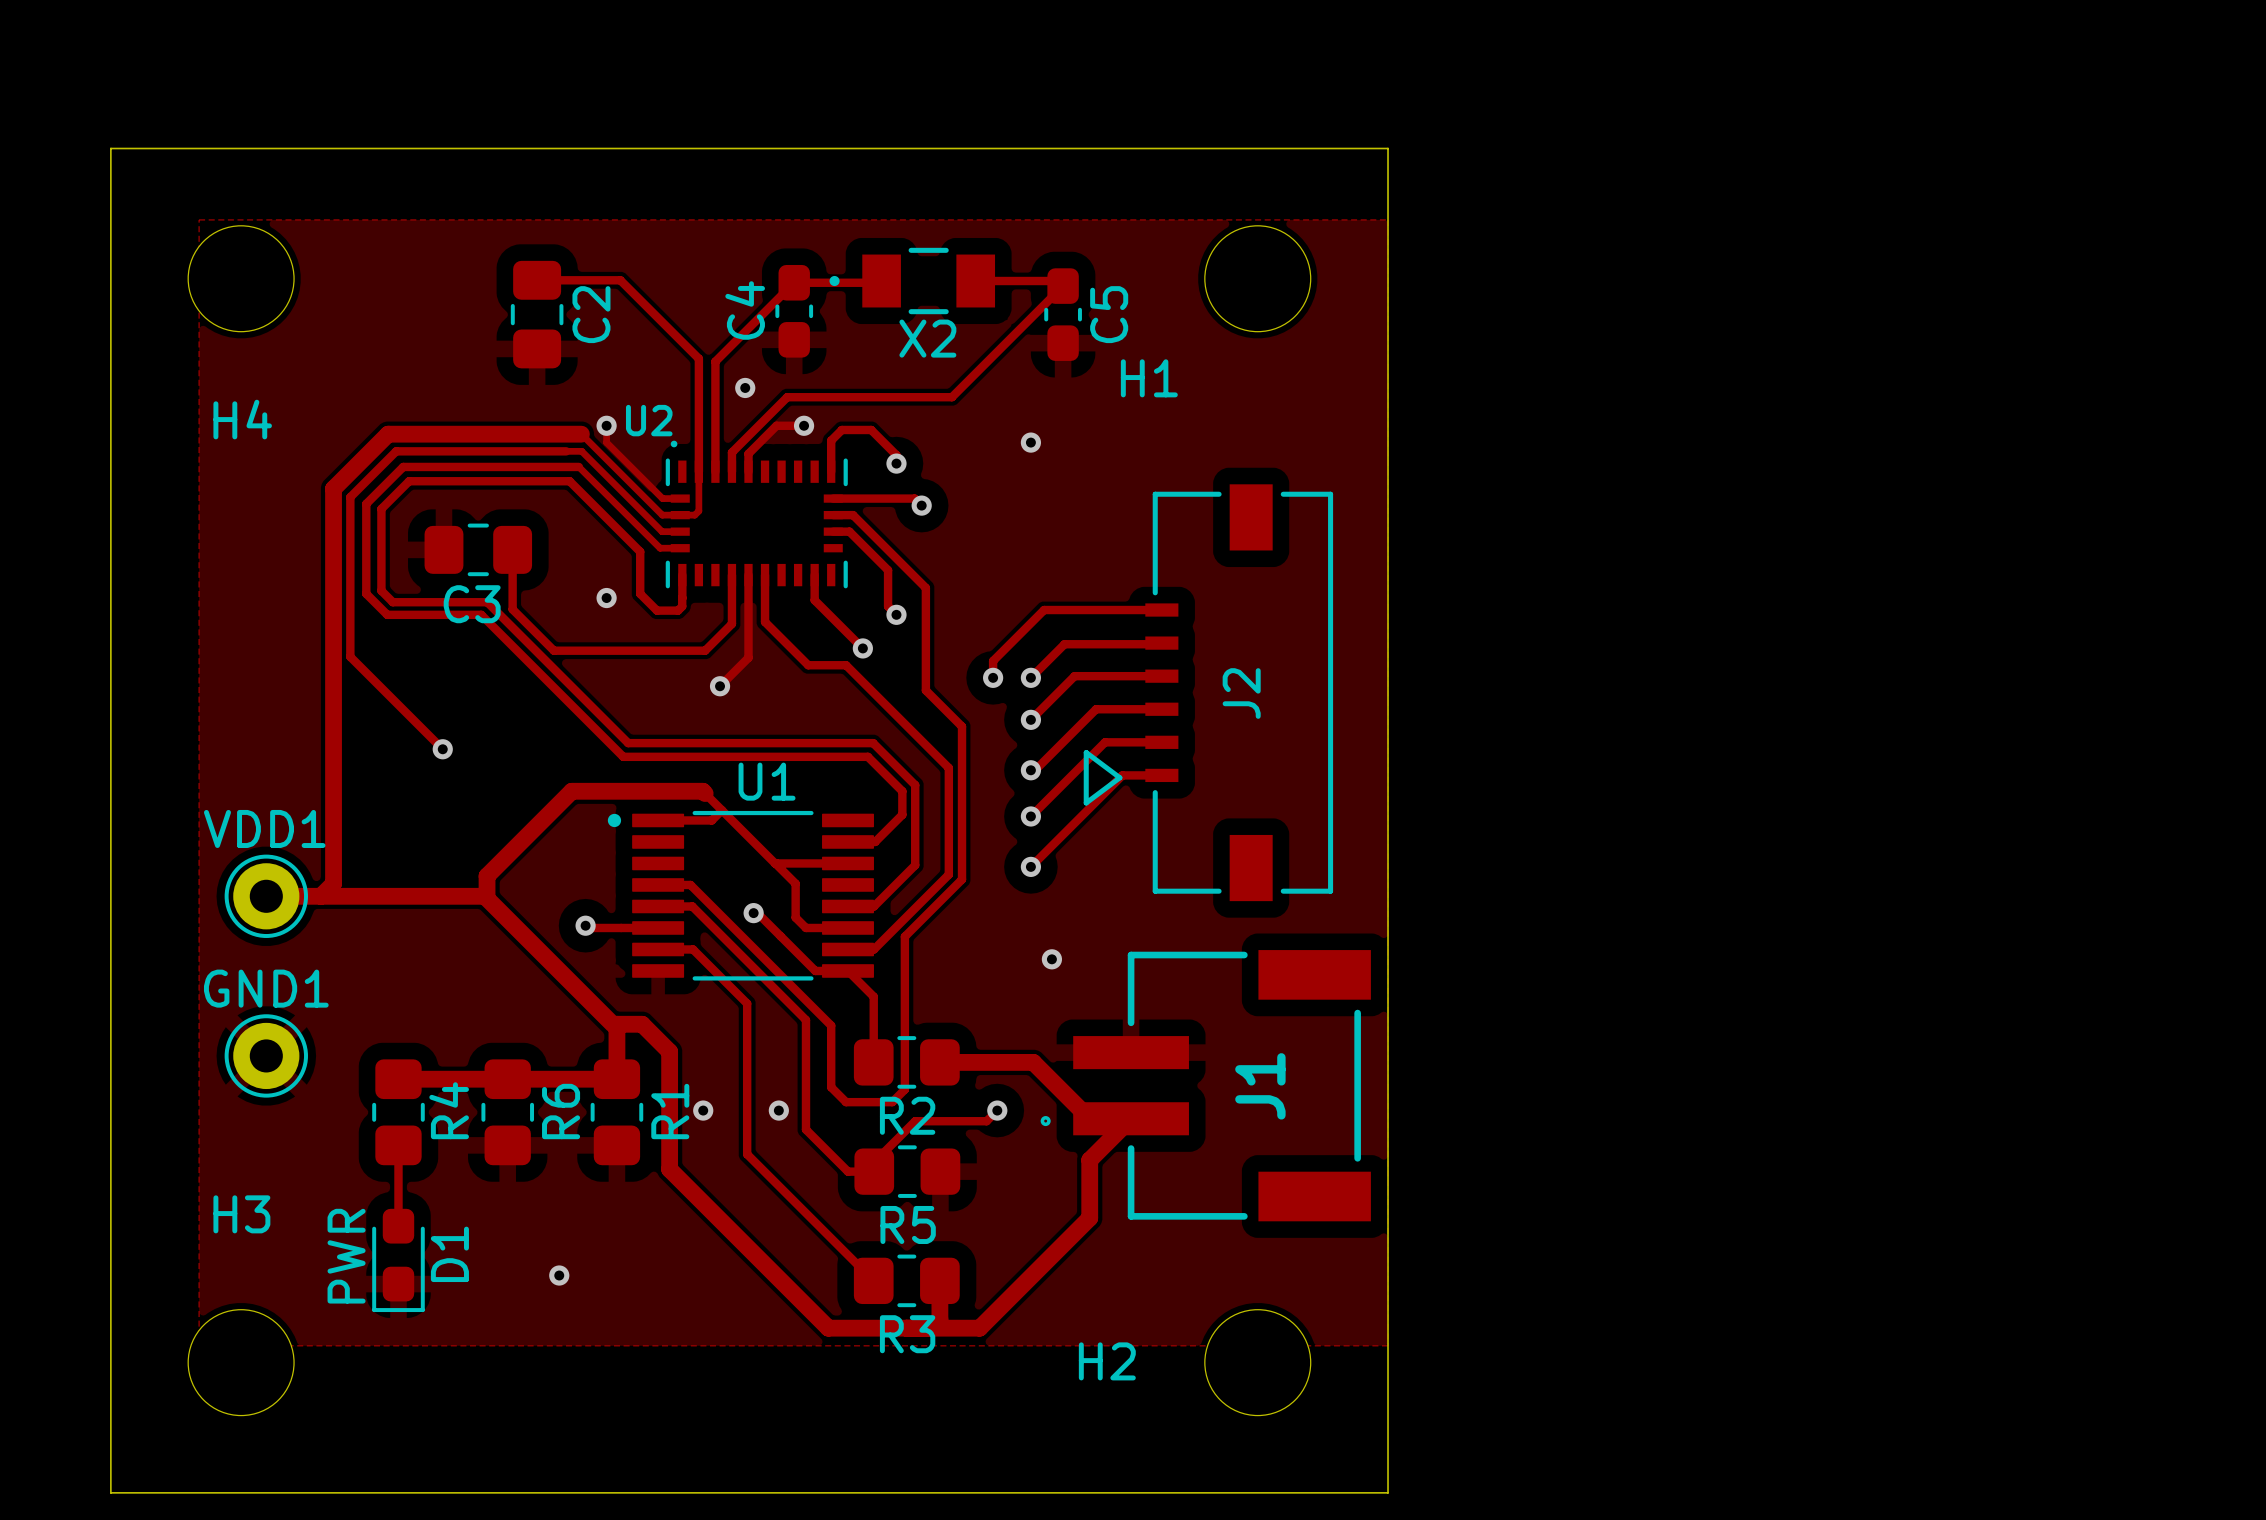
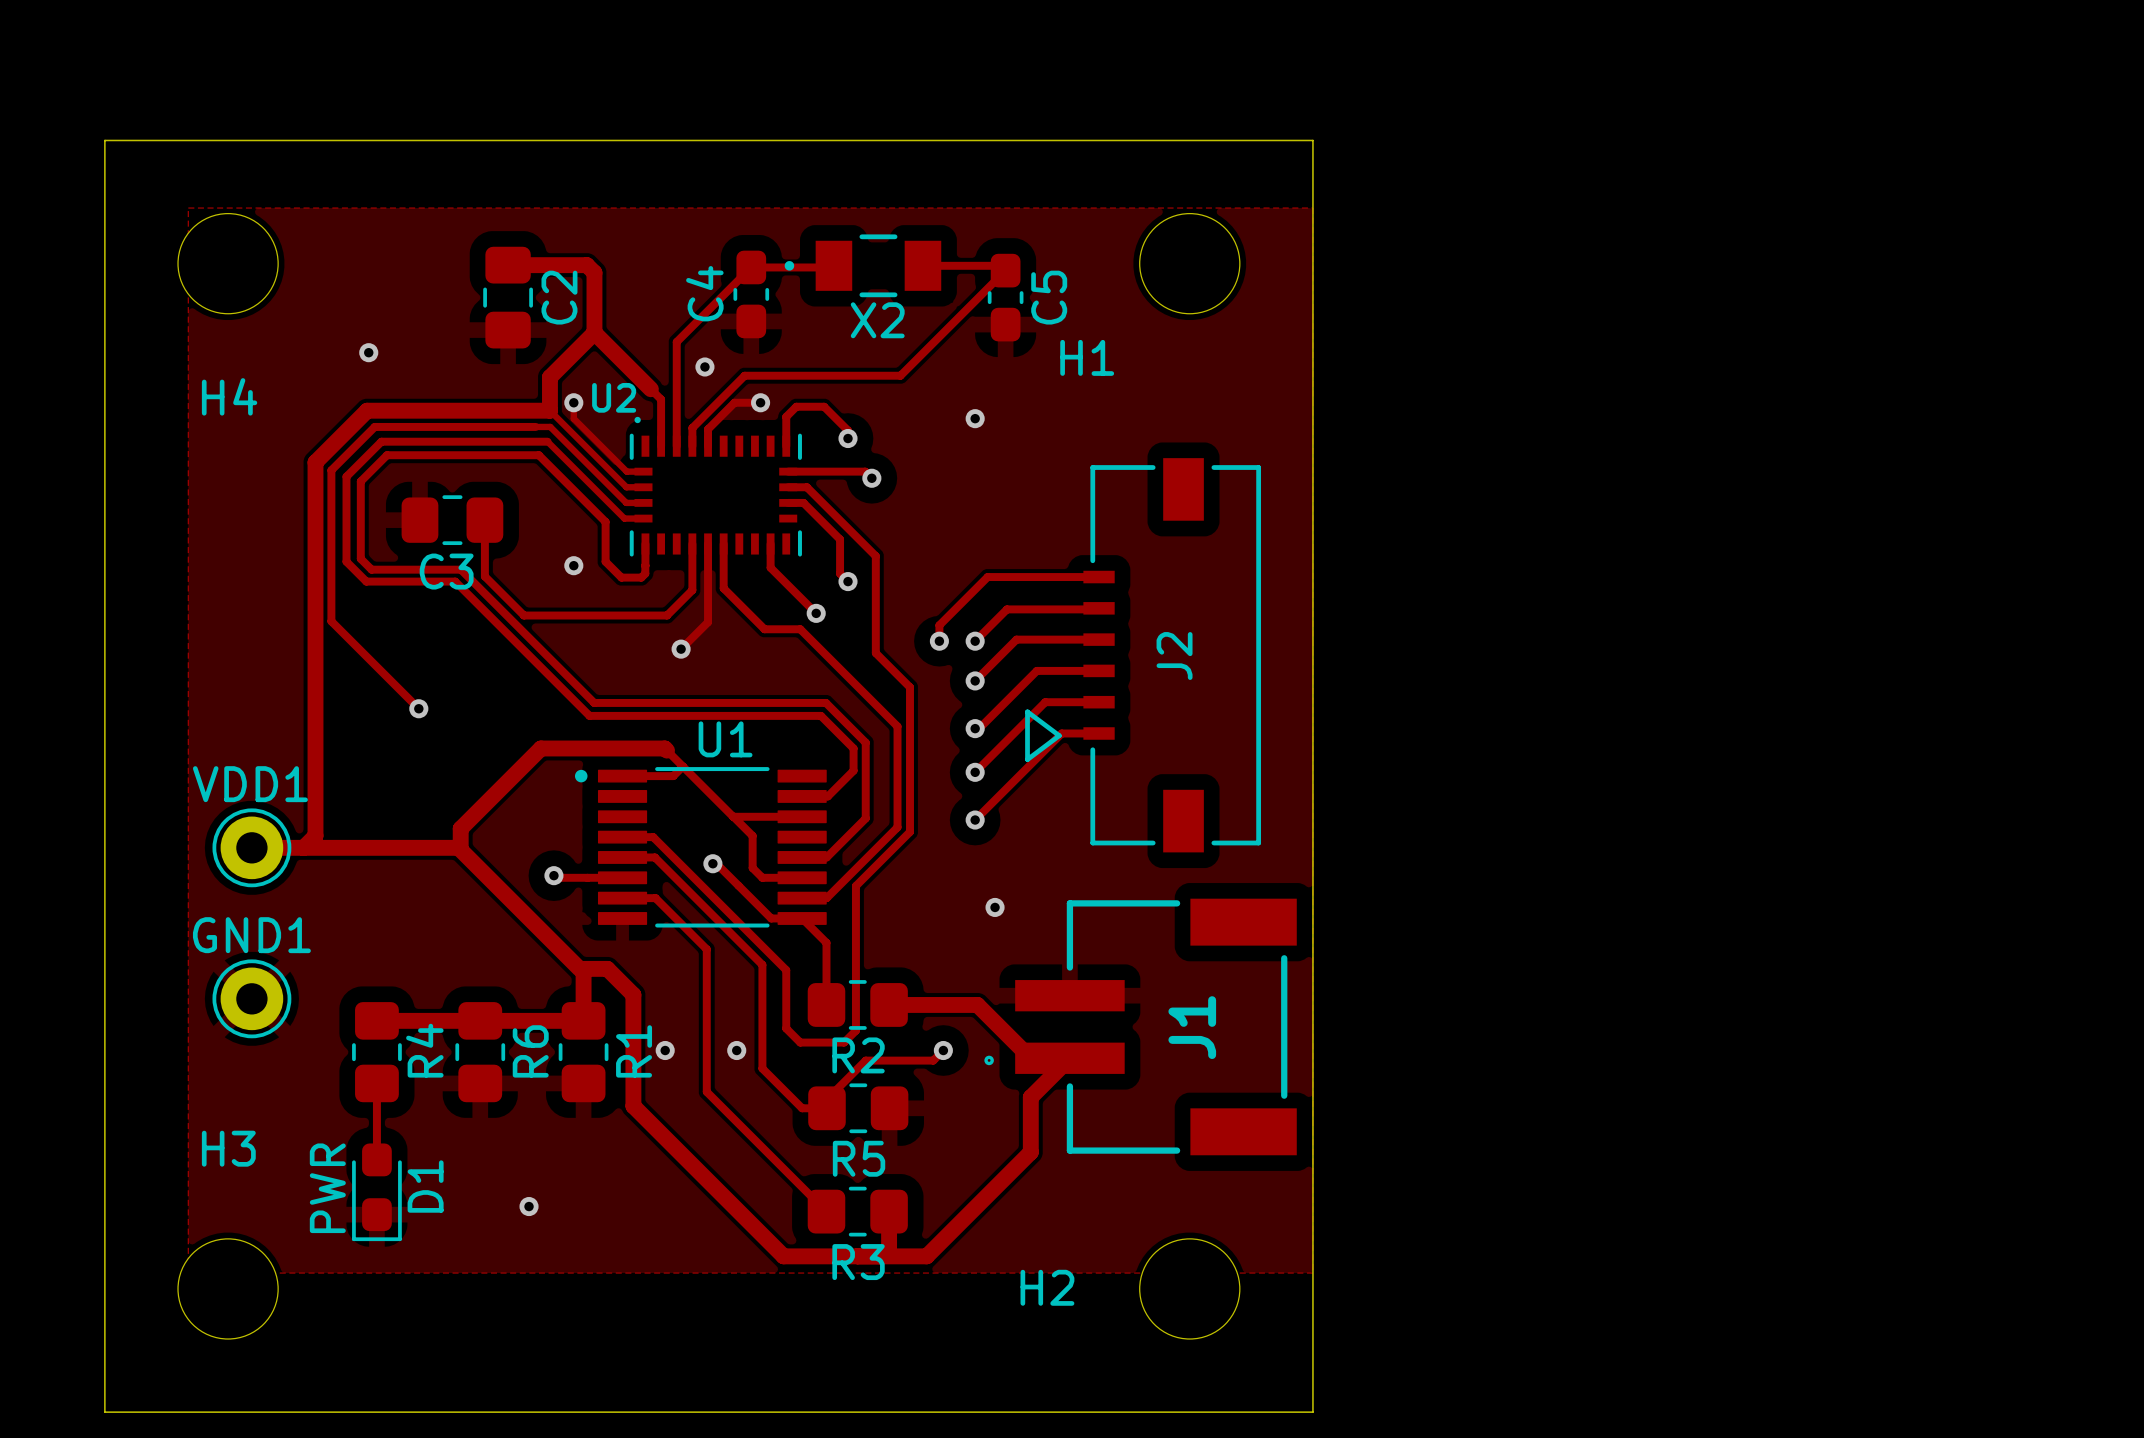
track width: thin (537, 280) (620, 280) (628, 288) -> thick (508, 265) (586, 265) (594, 272)
track: (628, 288) (698, 358) (698, 422) -> (594, 332) (661, 399)
track: none -> (594, 272) (594, 332)
track: none -> (594, 332) (549, 377) (549, 410)
via: none -> (368, 352)
track: (698, 471) (698, 511) (694, 515) (680, 515) -> none

